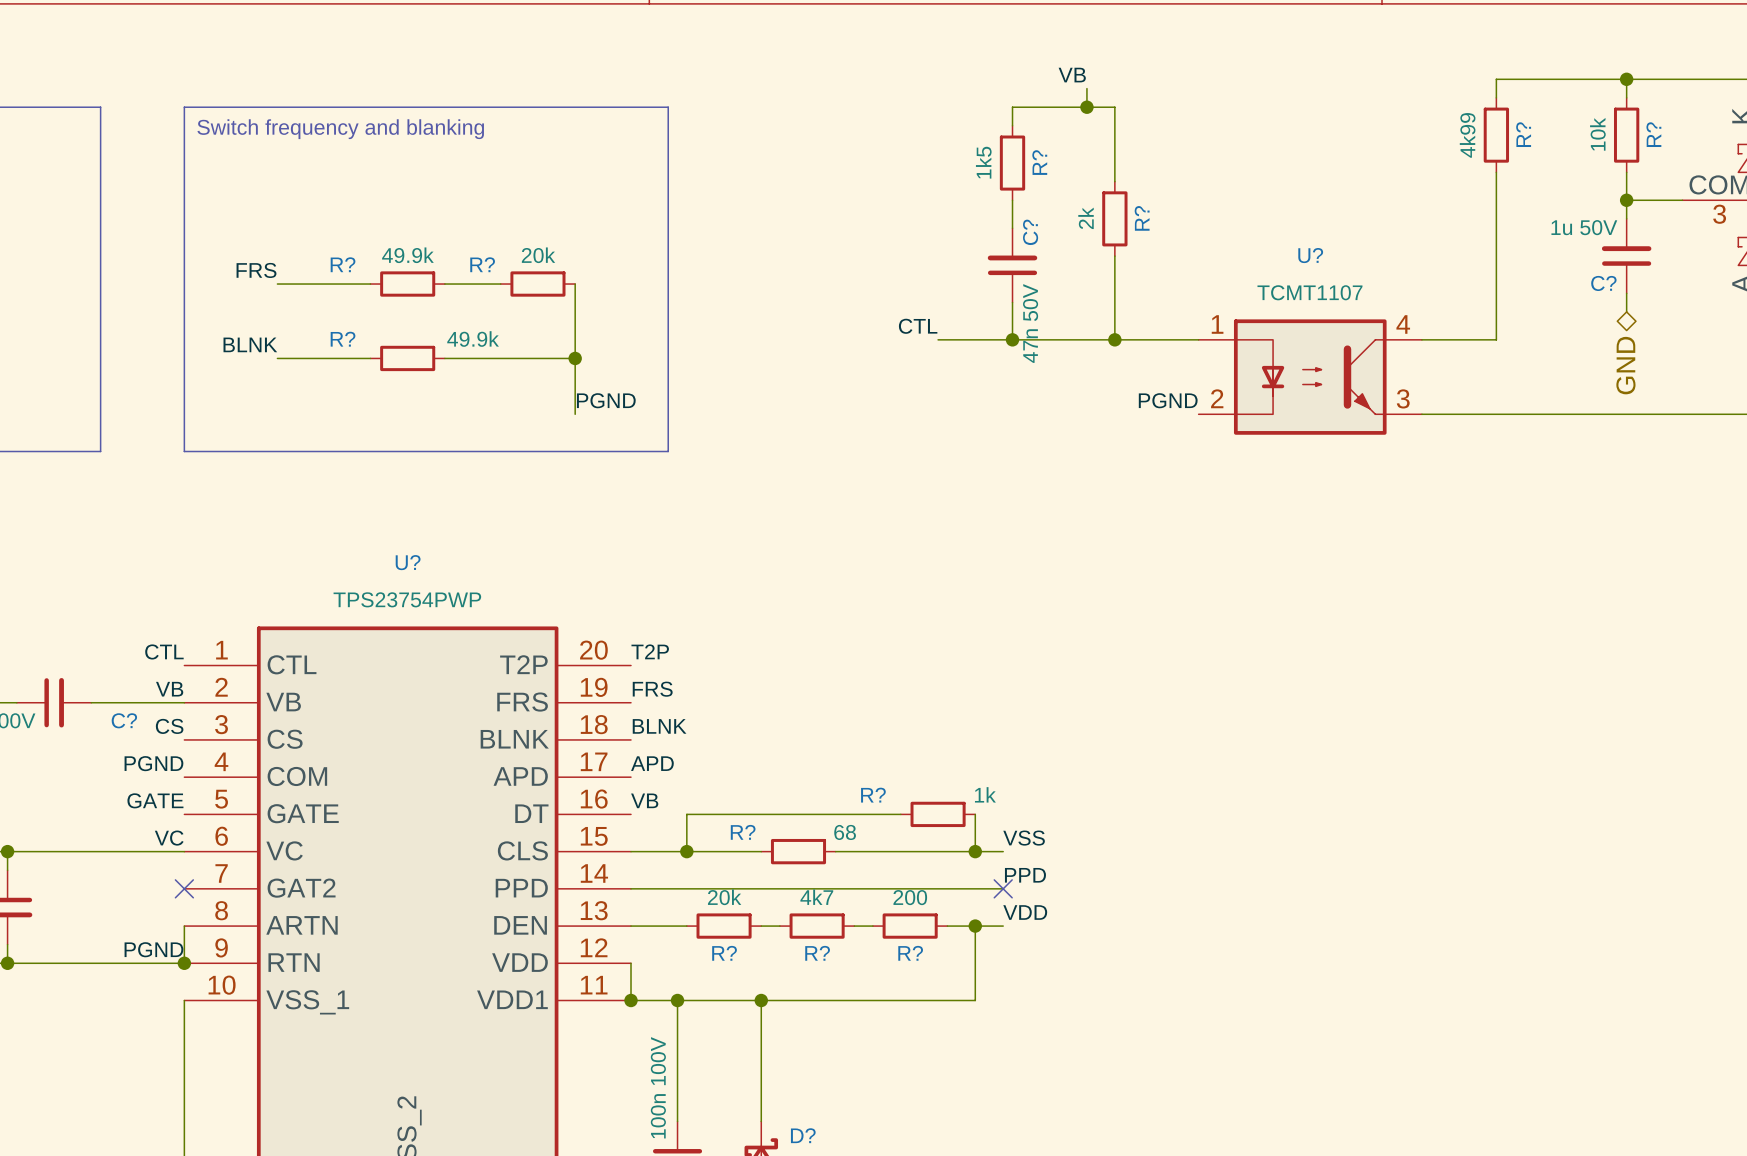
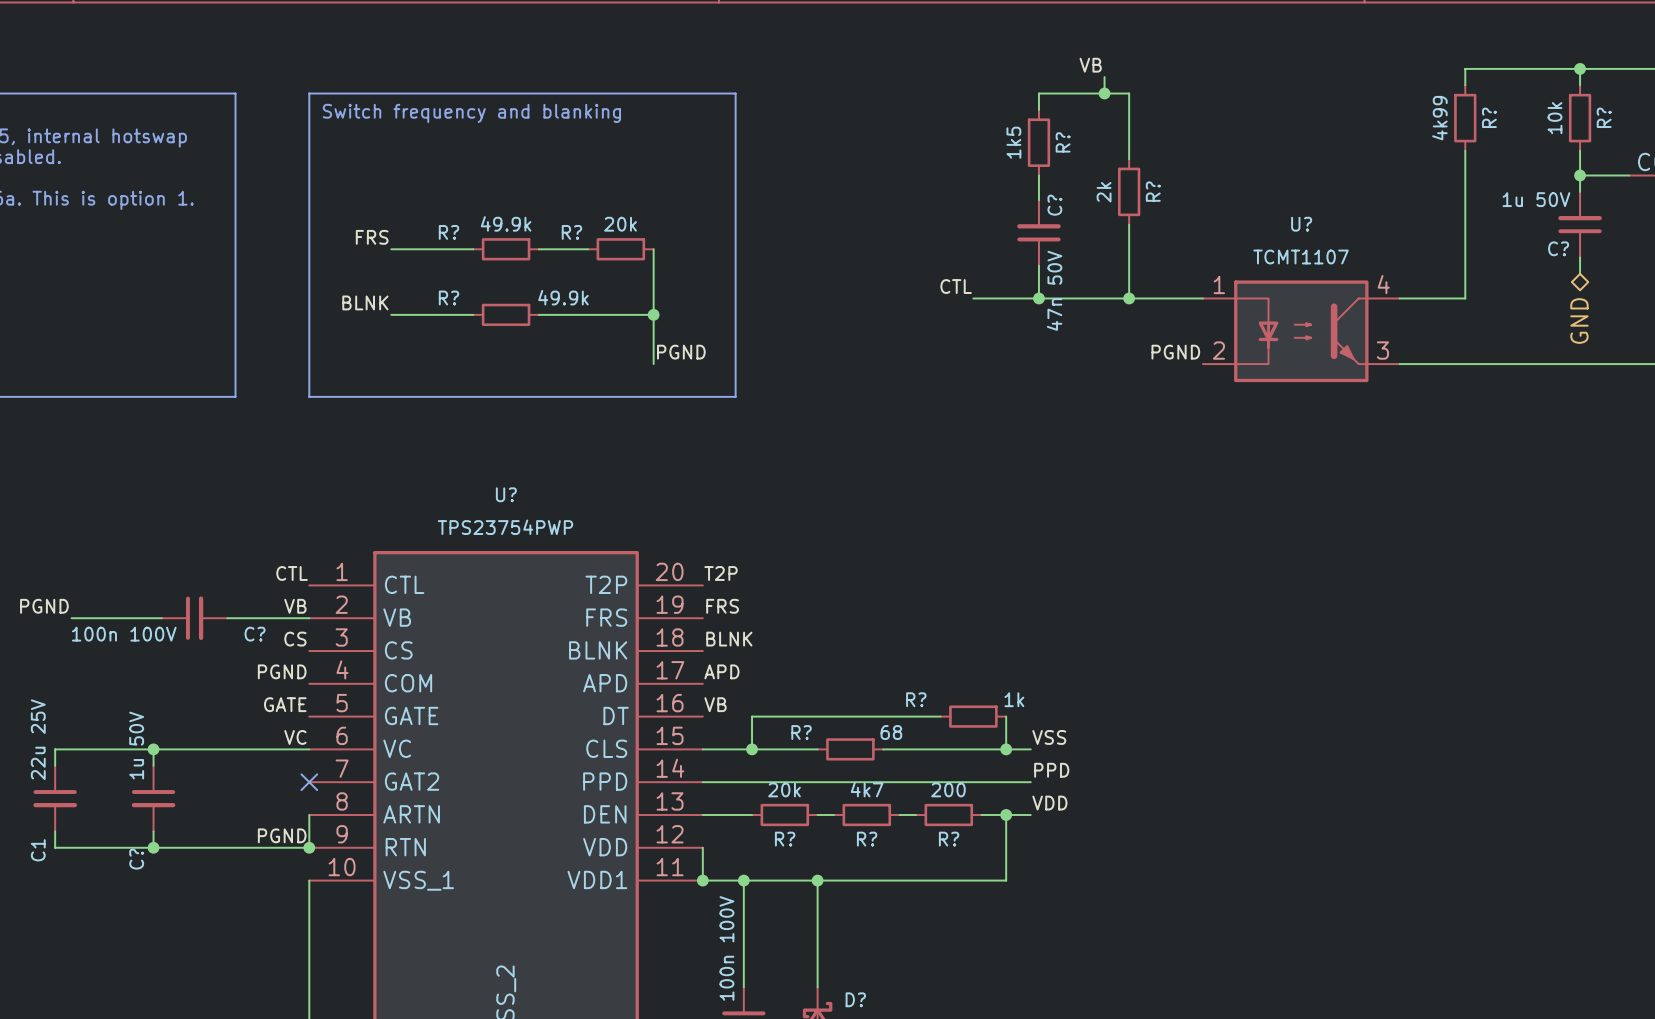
no-connect mark: (1003, 888) -> none

